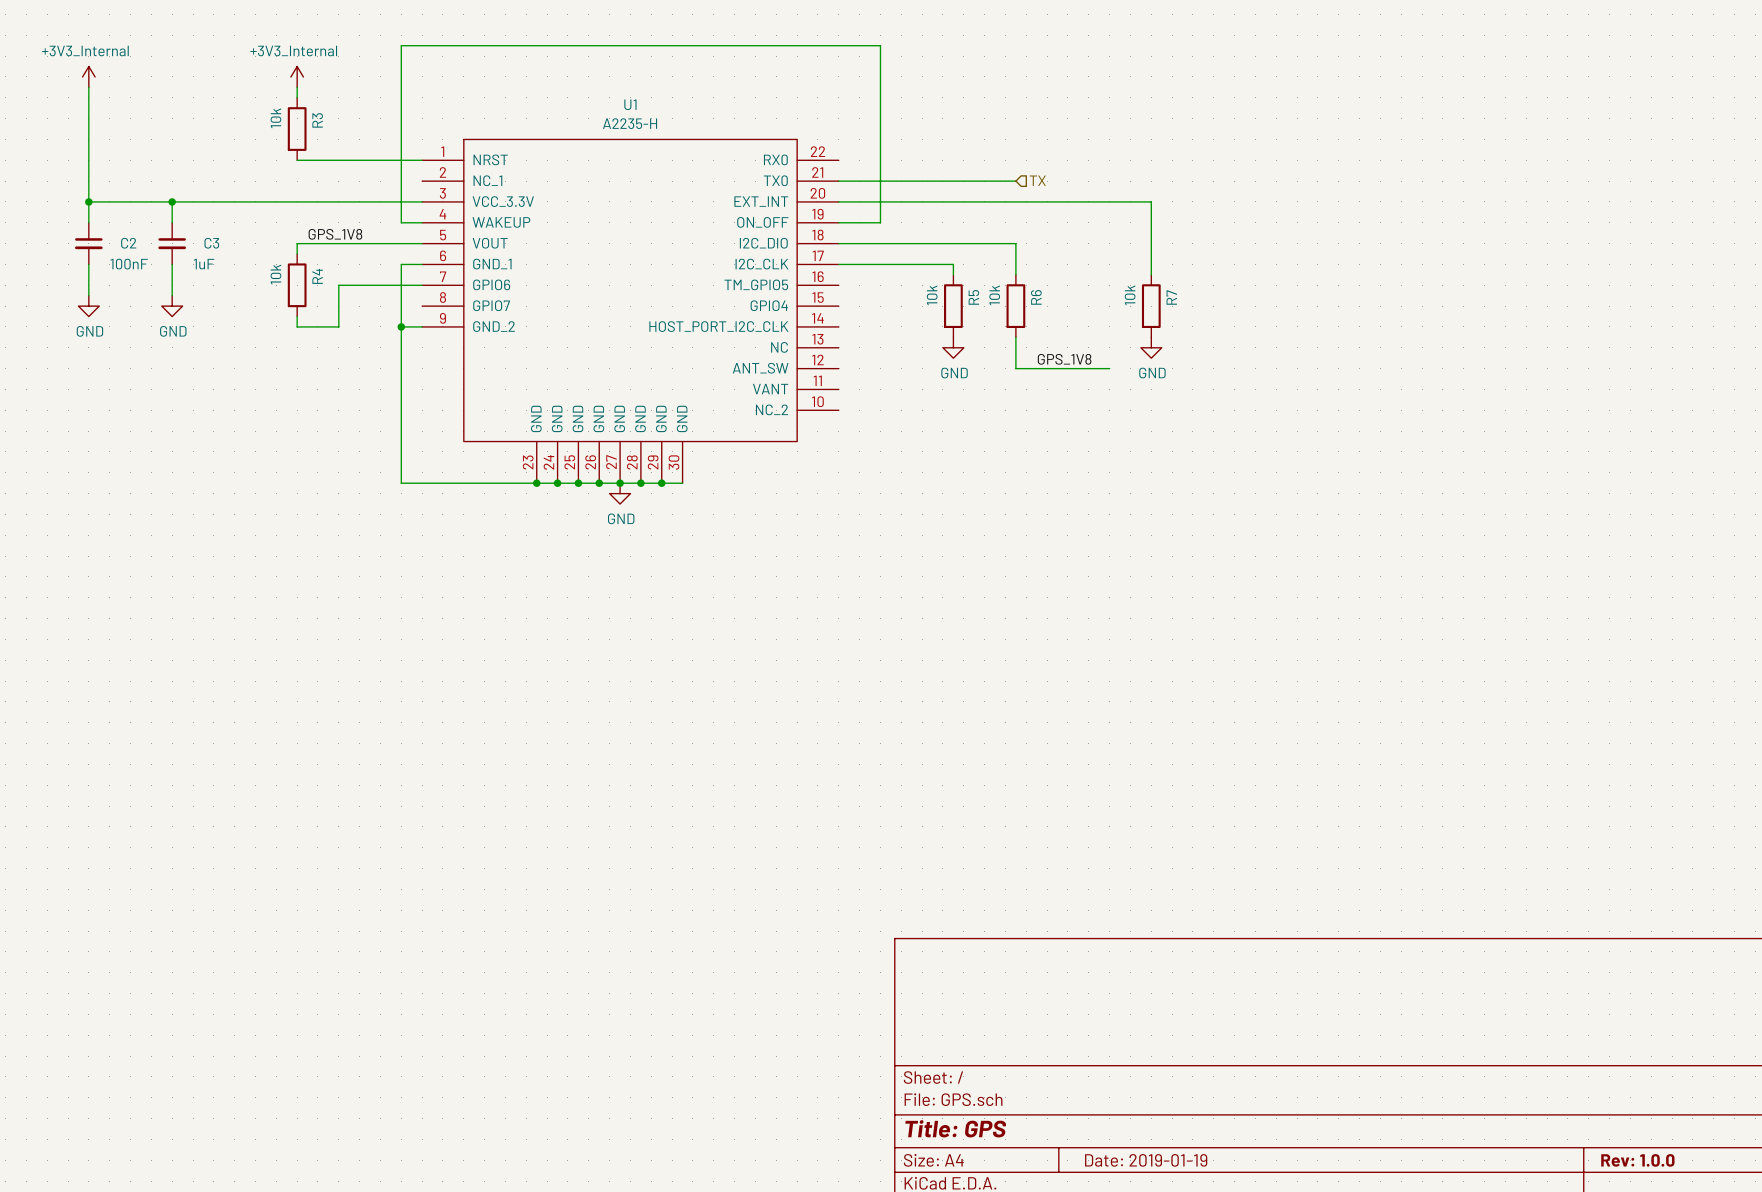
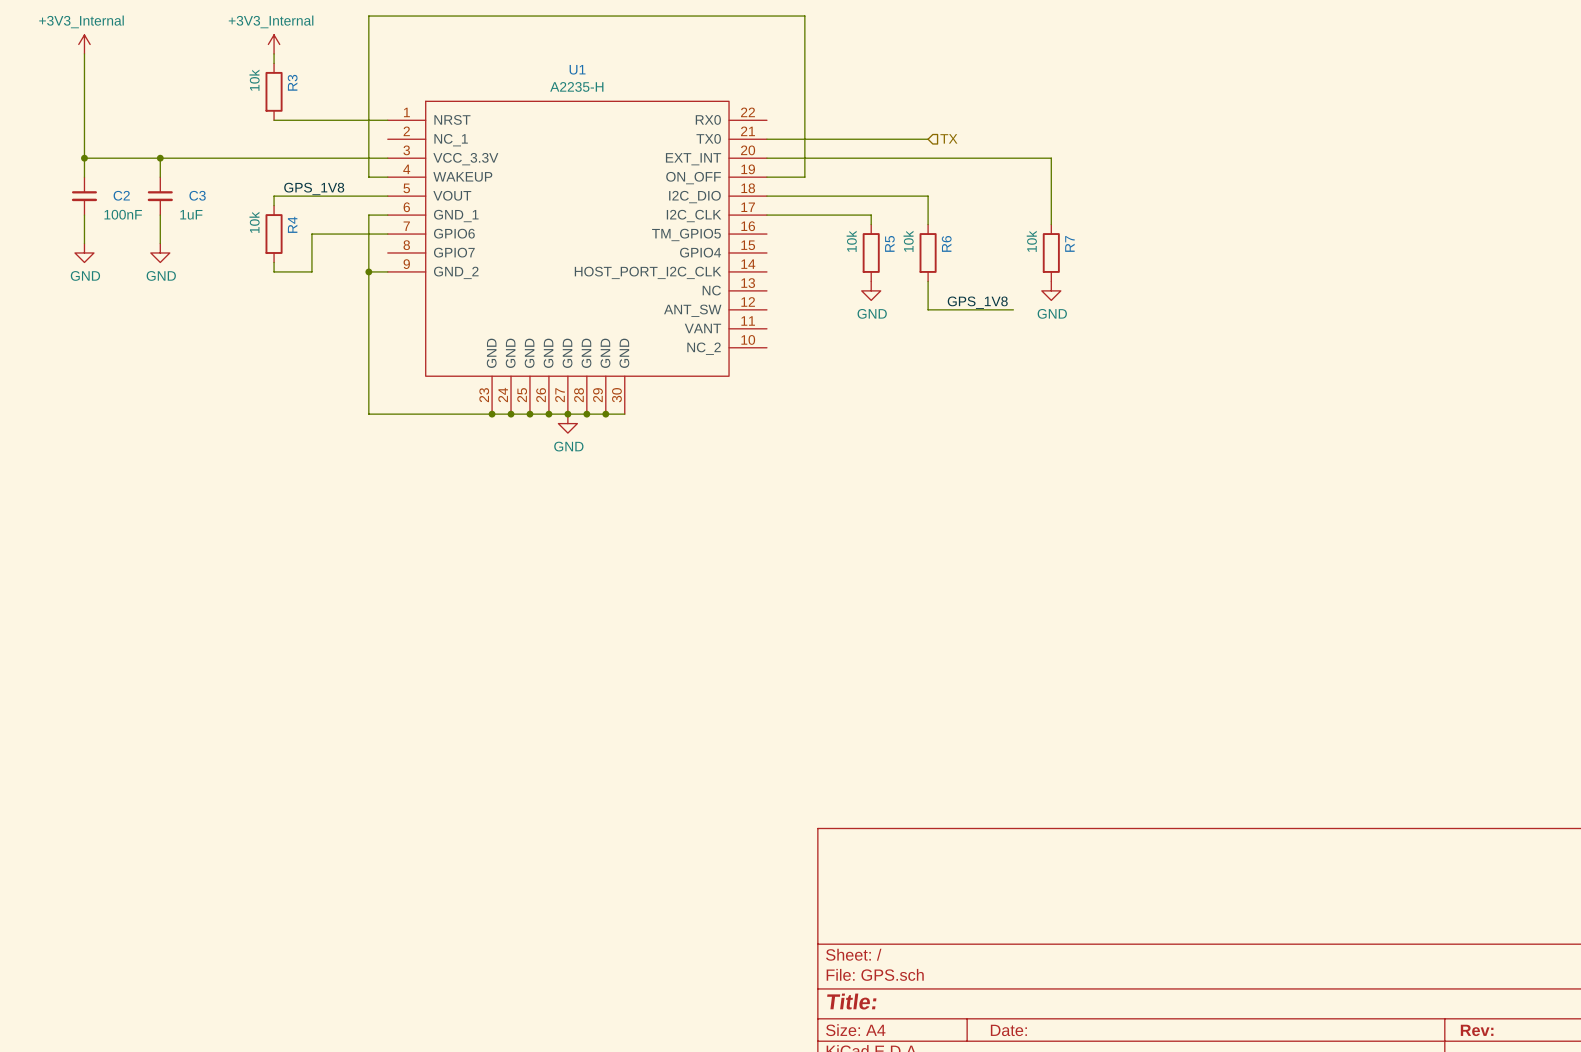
title block: Title: GPS (955, 1128) -> Title: (851, 1001)
title block: Date: 2019-01-19 (1146, 1160) -> Date: (1008, 1030)
title block: Rev: 1.0.0 (1637, 1160) -> Rev: (1477, 1030)

